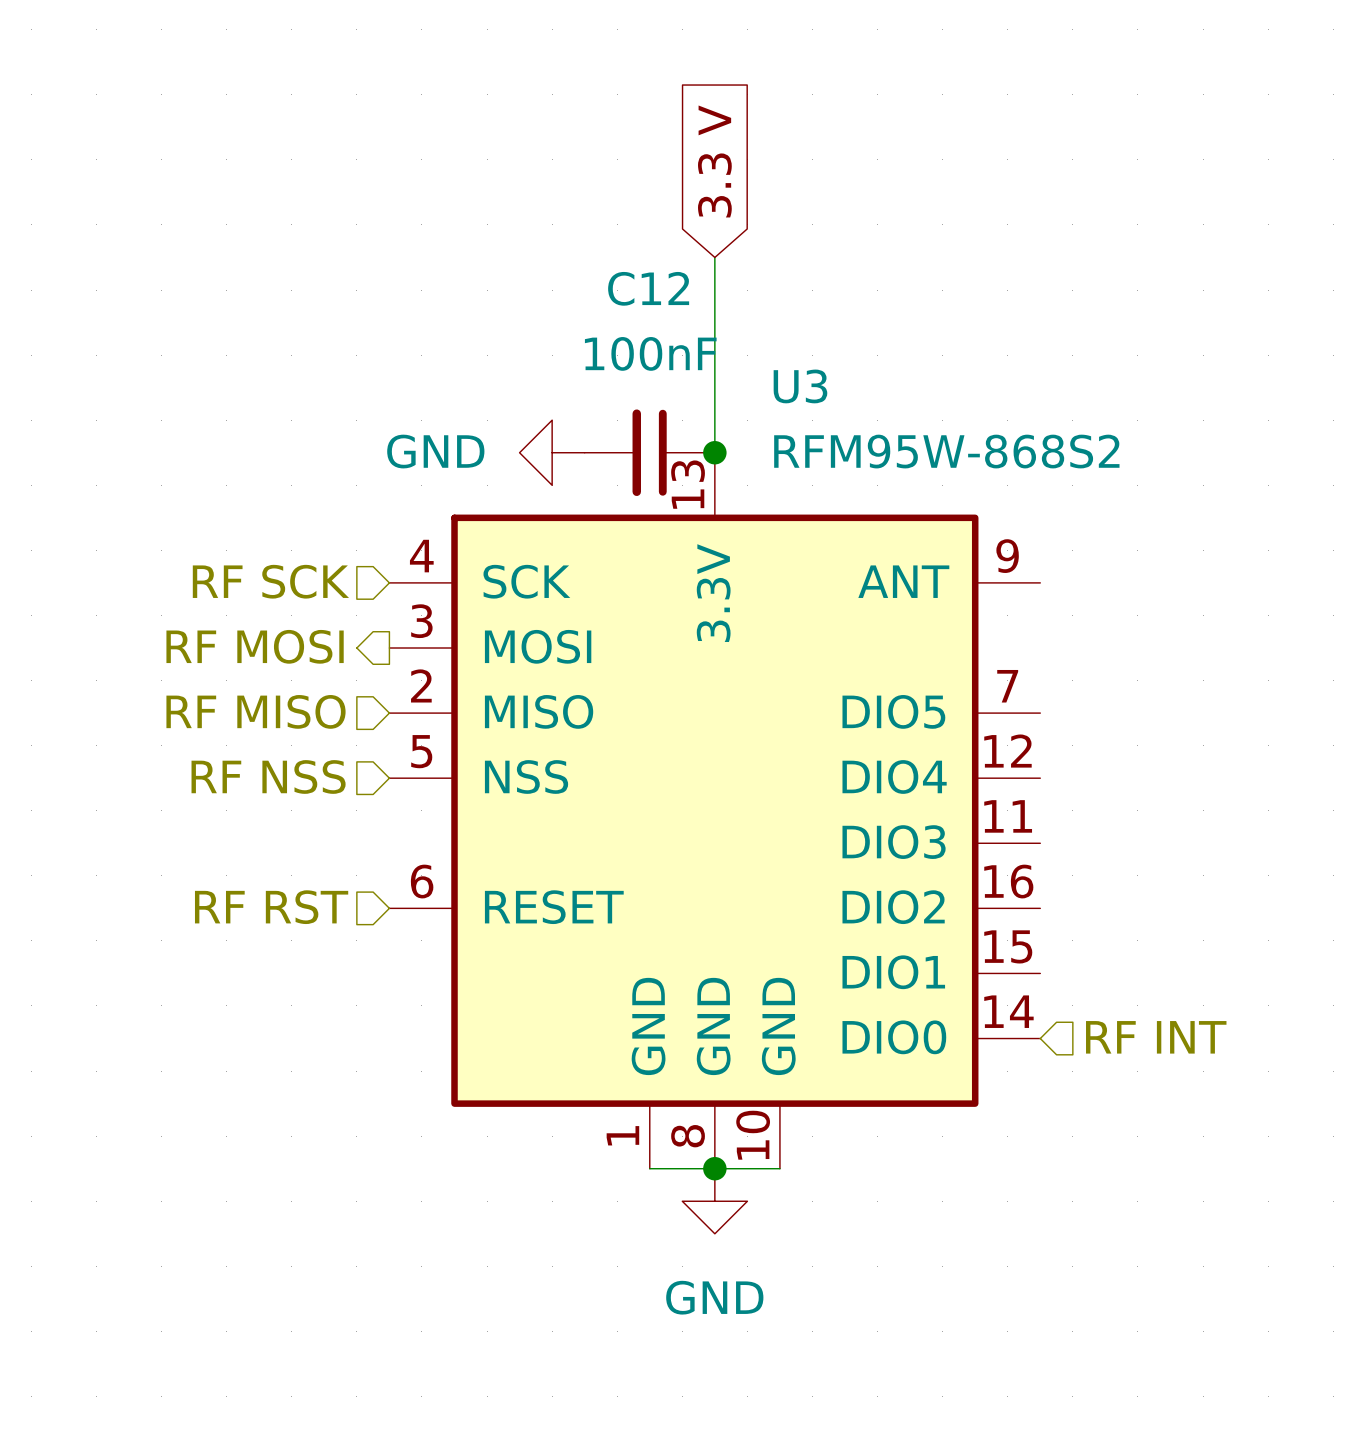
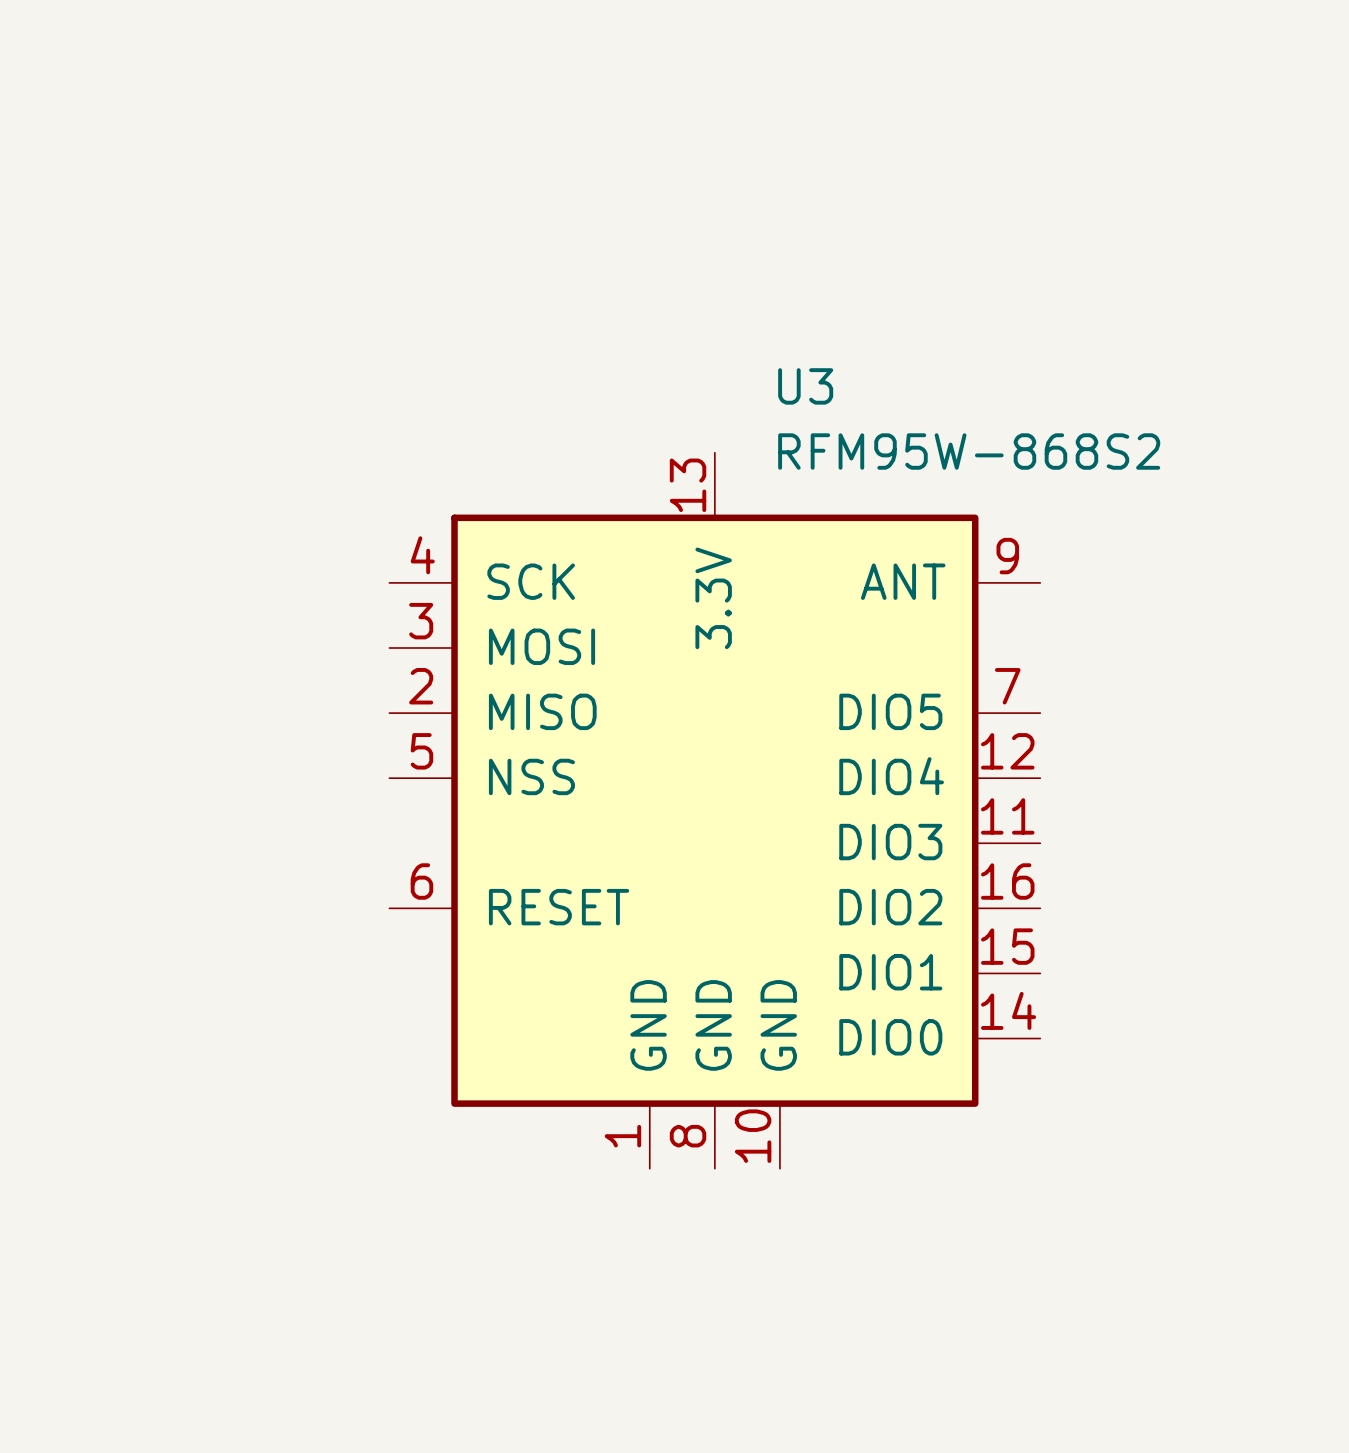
global label: 3.3 V (714, 161) -> none
wire: (714, 257) (714, 452) -> none
power symbol: GND (552, 452) -> none
C12: 100nF (649, 452) -> none
junction: (714, 452) -> none
hierarchical label: RF SCK (270, 581) -> none
hierarchical label: RF MOSI (255, 646) -> none
hierarchical label: RF MISO (256, 711) -> none
hierarchical label: RF NSS (268, 776) -> none
hierarchical label: RF RST (271, 907) -> none
hierarchical label: RF INT (1156, 1037) -> none
wire: (649, 1168) (779, 1168) -> none
junction: (714, 1168) -> none
power symbol: GND (714, 1201) -> none

